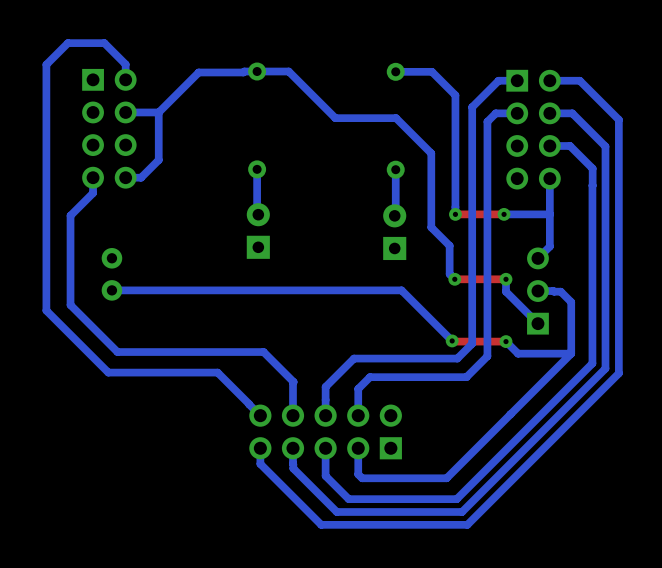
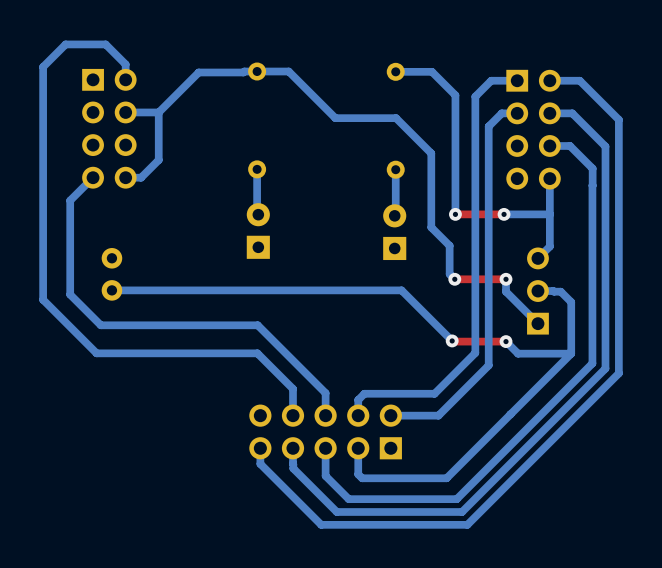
bottom track: (105, 44) (67, 43) (46, 64) (46, 310) (108, 372) (217, 372) (260, 415) -> (105, 44) (65, 44) (43, 66) (43, 299) (96, 353) (257, 353) (292, 388)
bottom track: (498, 80) (472, 107) (472, 343) (457, 358) (353, 358) (325, 386) (325, 393) -> none
bottom track: (501, 113) (495, 113) (487, 121) (487, 356) (466, 377) (369, 377) (358, 388) (358, 399) -> (498, 80) (491, 80) (475, 96) (475, 353) (434, 393) (364, 393) (358, 399)
bottom track: none -> (501, 113) (488, 126) (488, 365) (438, 415) (390, 415)
bottom track: (93, 177) (93, 193) (70, 215) (70, 305) (117, 352) (263, 352) (293, 382) (292, 388) -> (93, 177) (70, 200) (70, 294) (100, 325) (257, 325) (325, 393)

